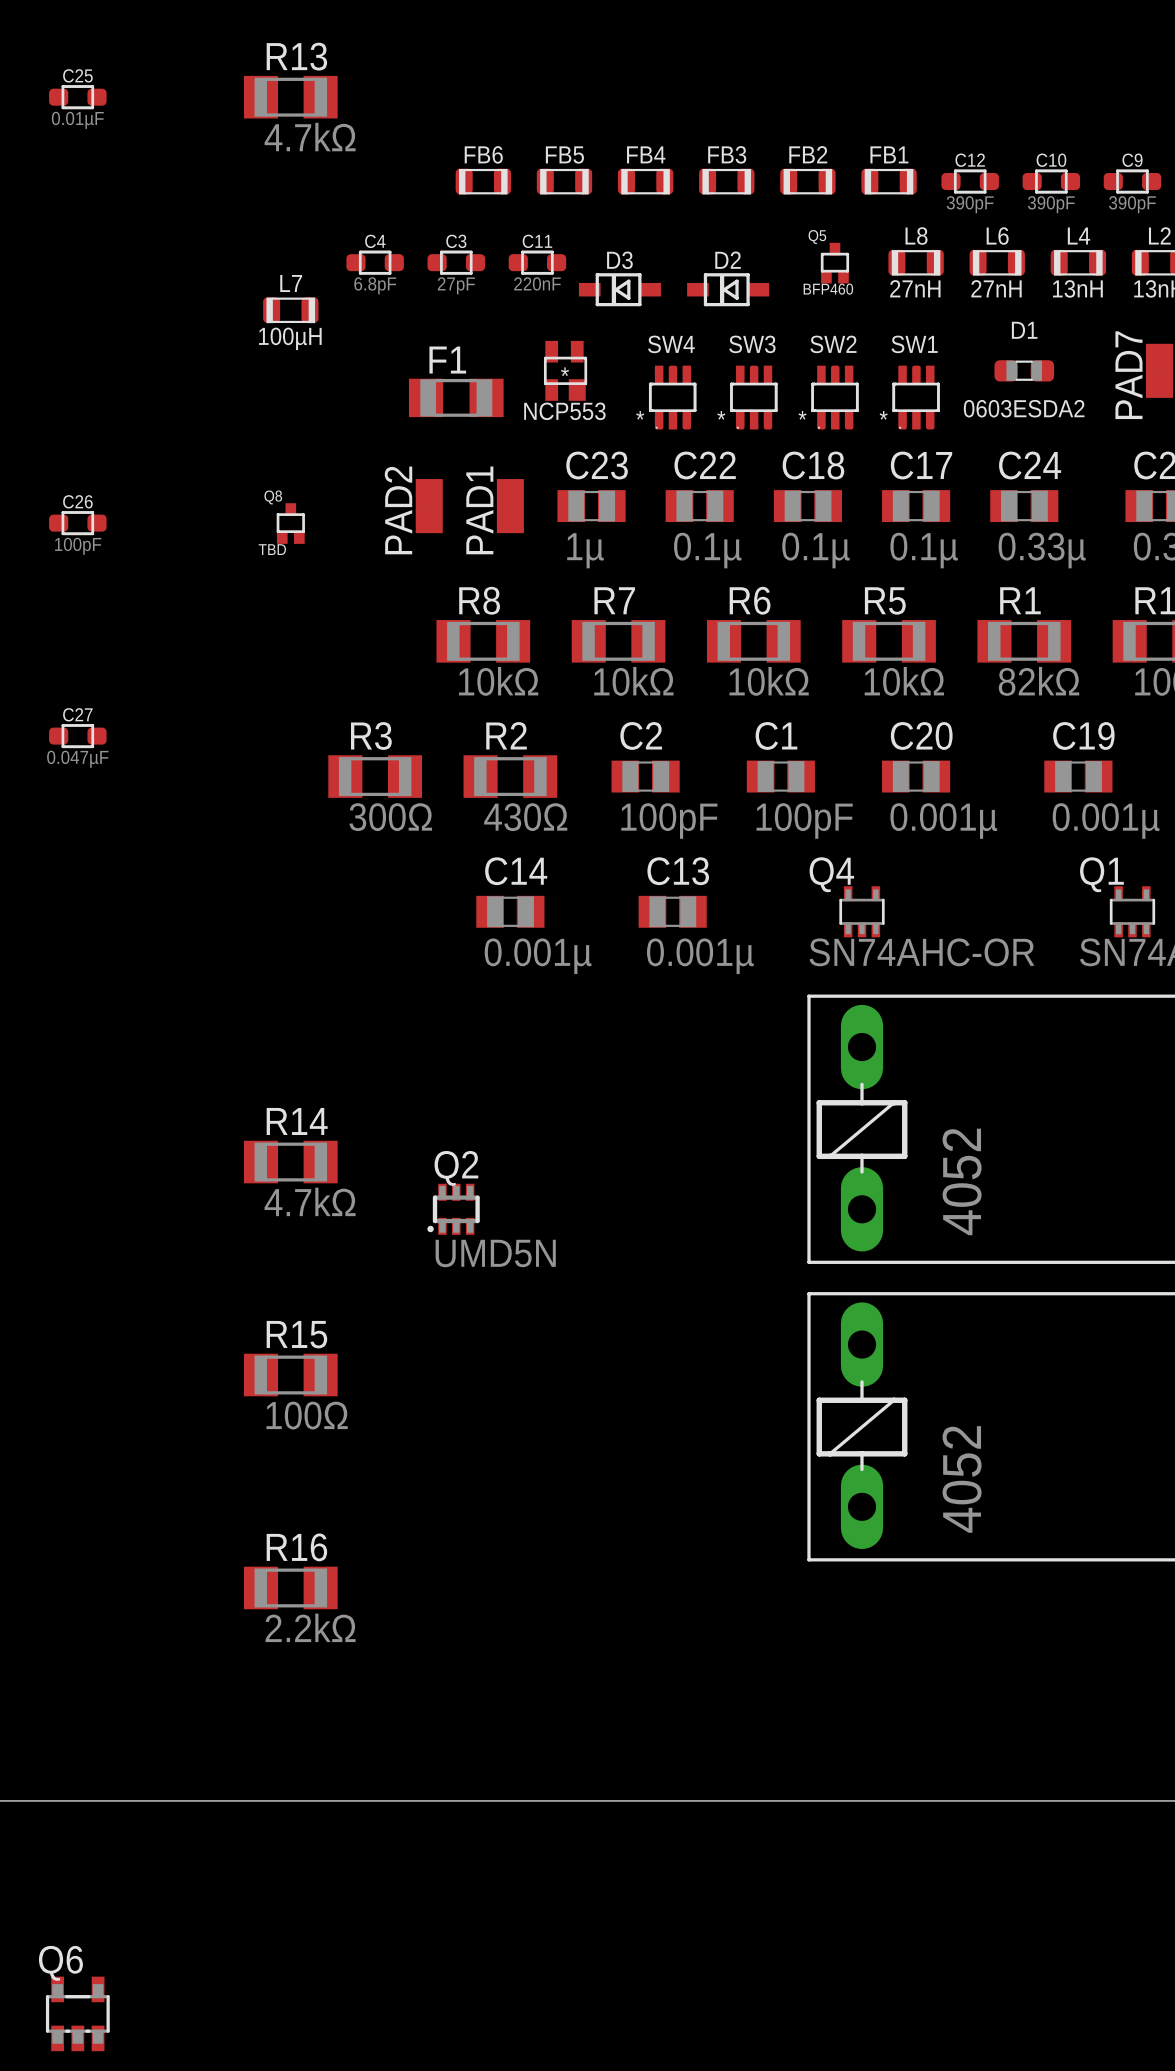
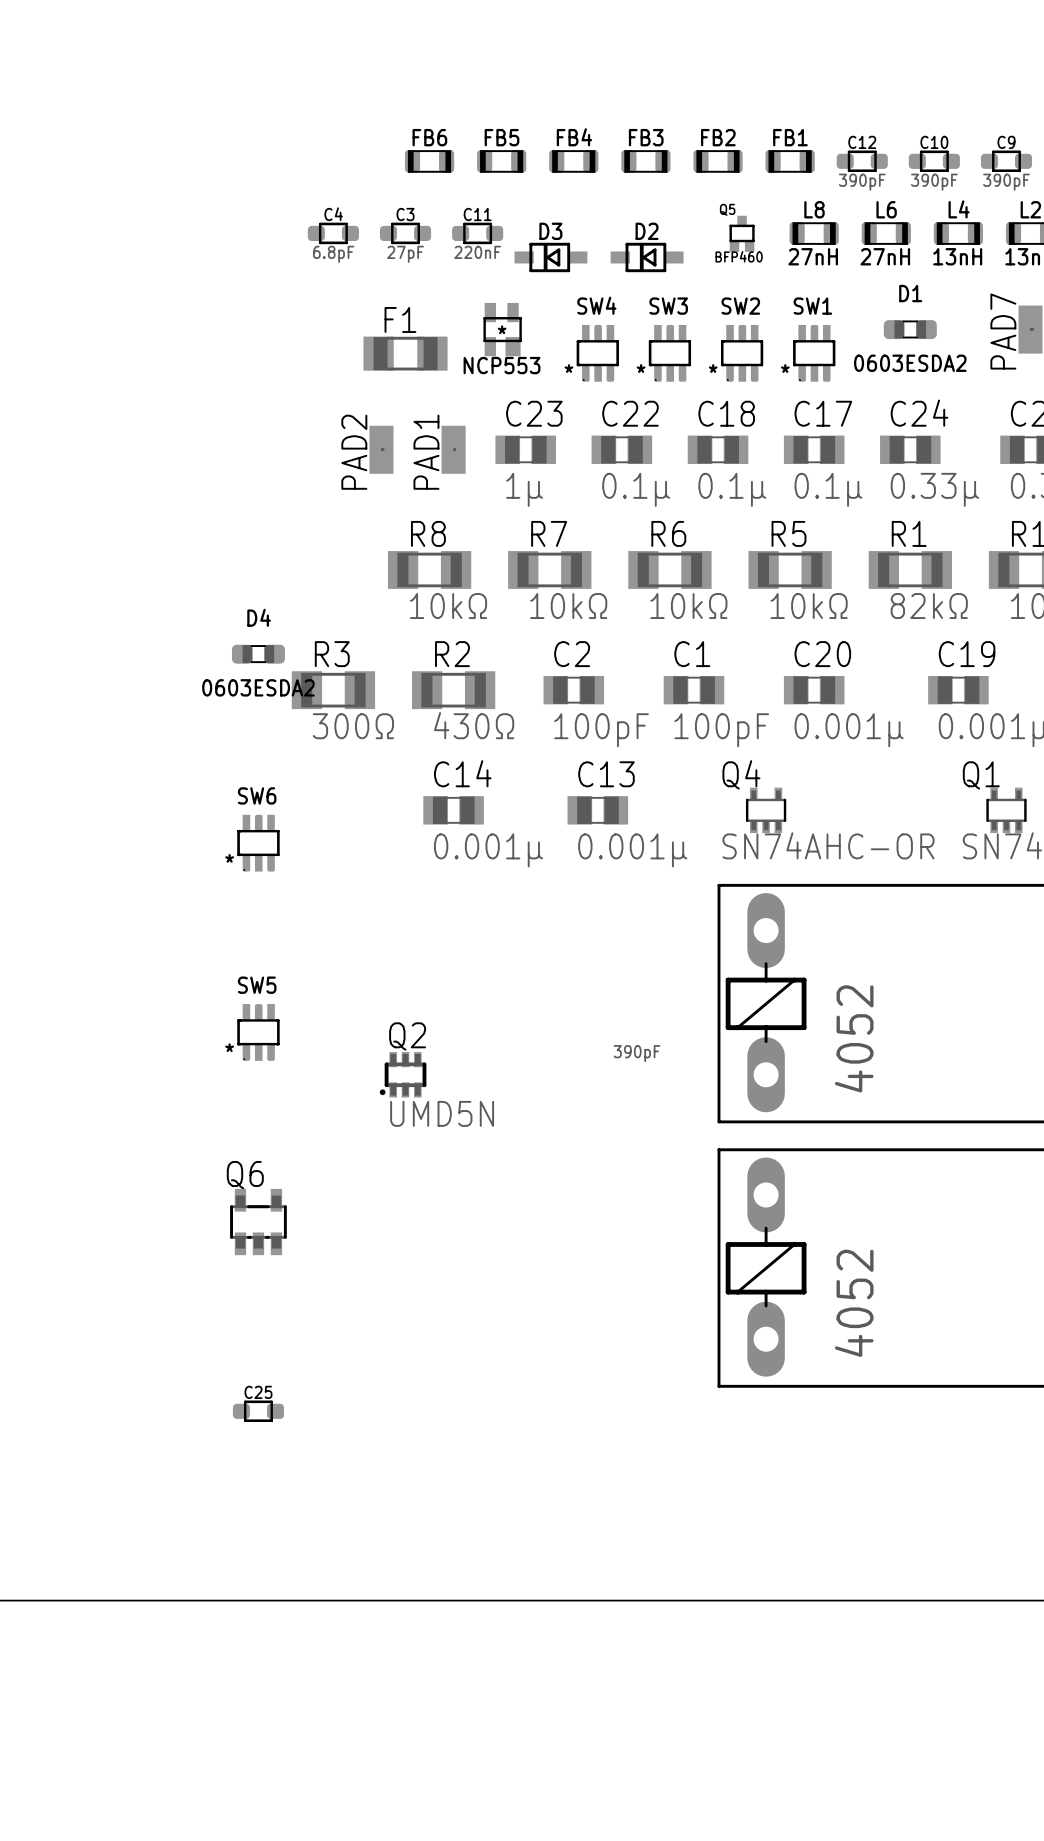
C25 position: (77, 97) -> (258, 1411)
R13: 4.7kΩ (290, 97) -> none
C25 value: 0.01µF (77, 120) -> 390pF (637, 1053)
L7: 100µH (290, 310) -> none
C26: 100pF (77, 523) -> none
Q8: TBD (290, 523) -> none
C27: 0.047µF (77, 736) -> none
D4: none -> 0603ESDA2 (258, 654)
SW6: none -> (258, 843)
SW5: none -> (258, 1032)
R14: 4.7kΩ (290, 1162) -> none
R15: 100Ω (290, 1375) -> none
R16: 2.2kΩ (290, 1587) -> none
Q6 position: (77, 2013) -> (258, 1222)

